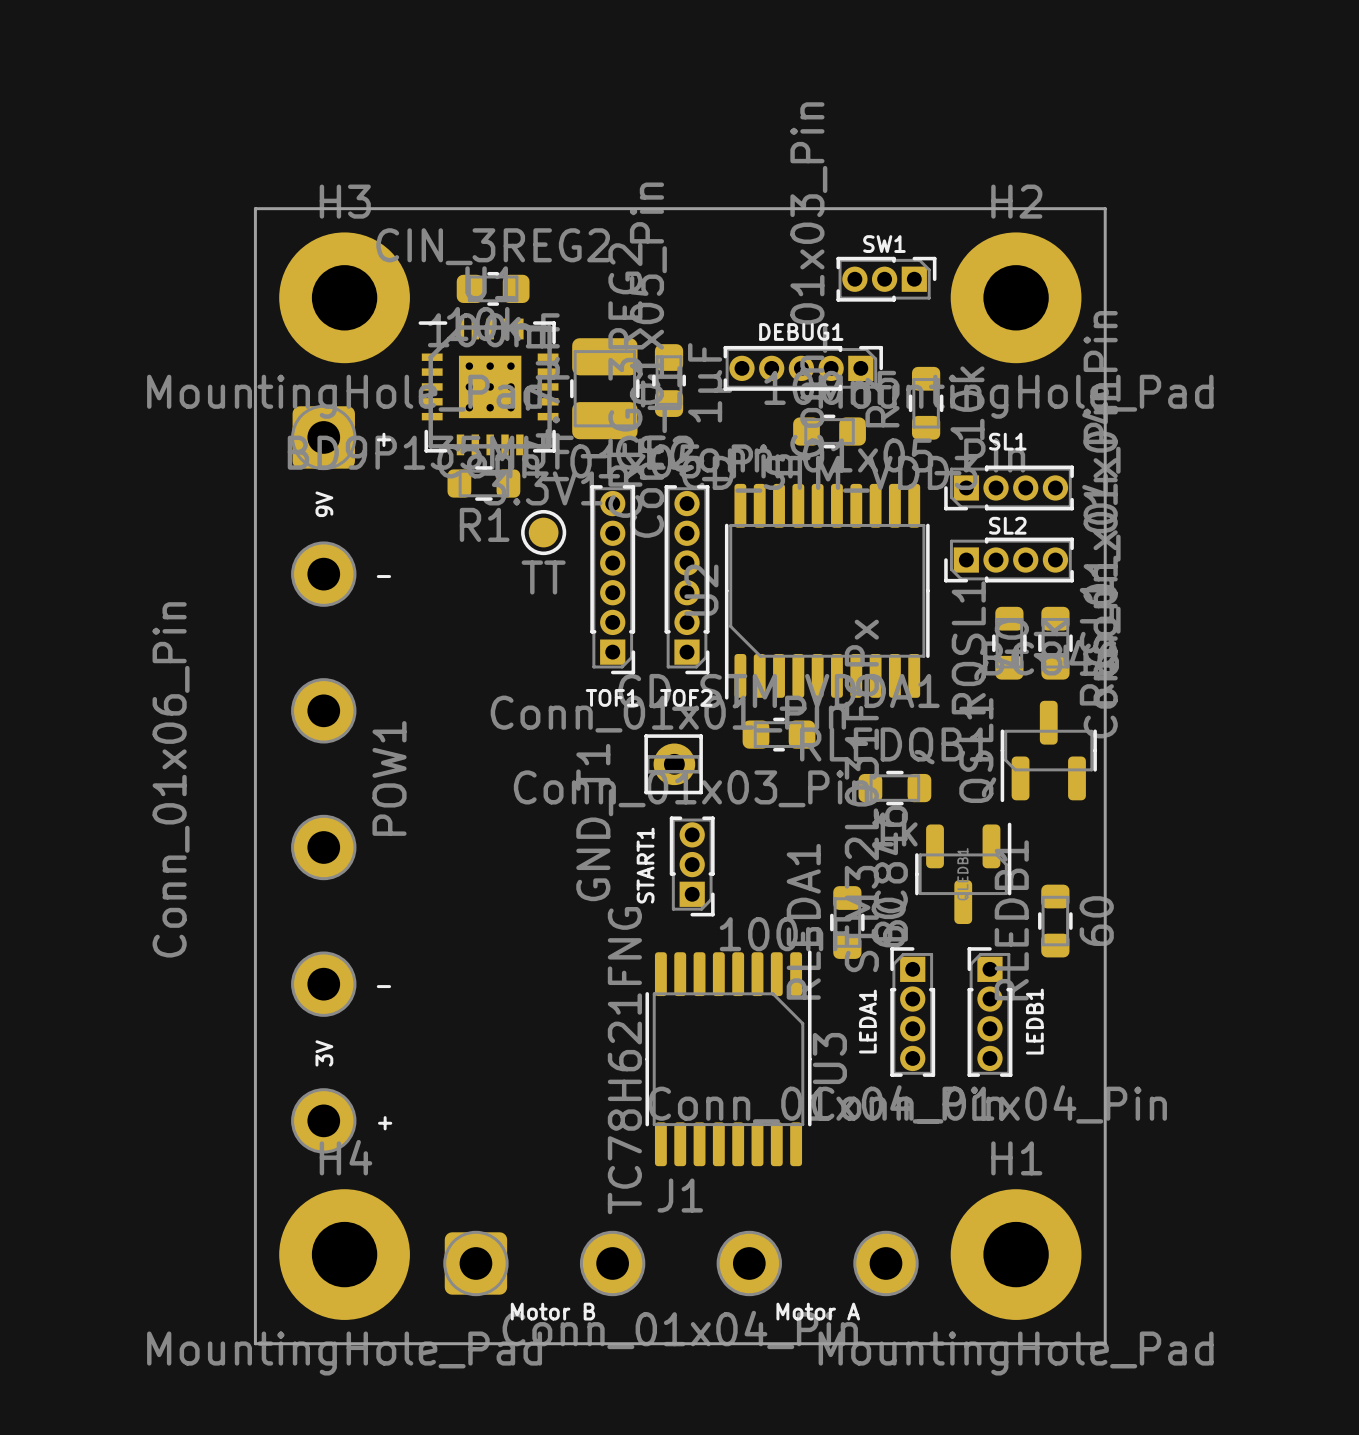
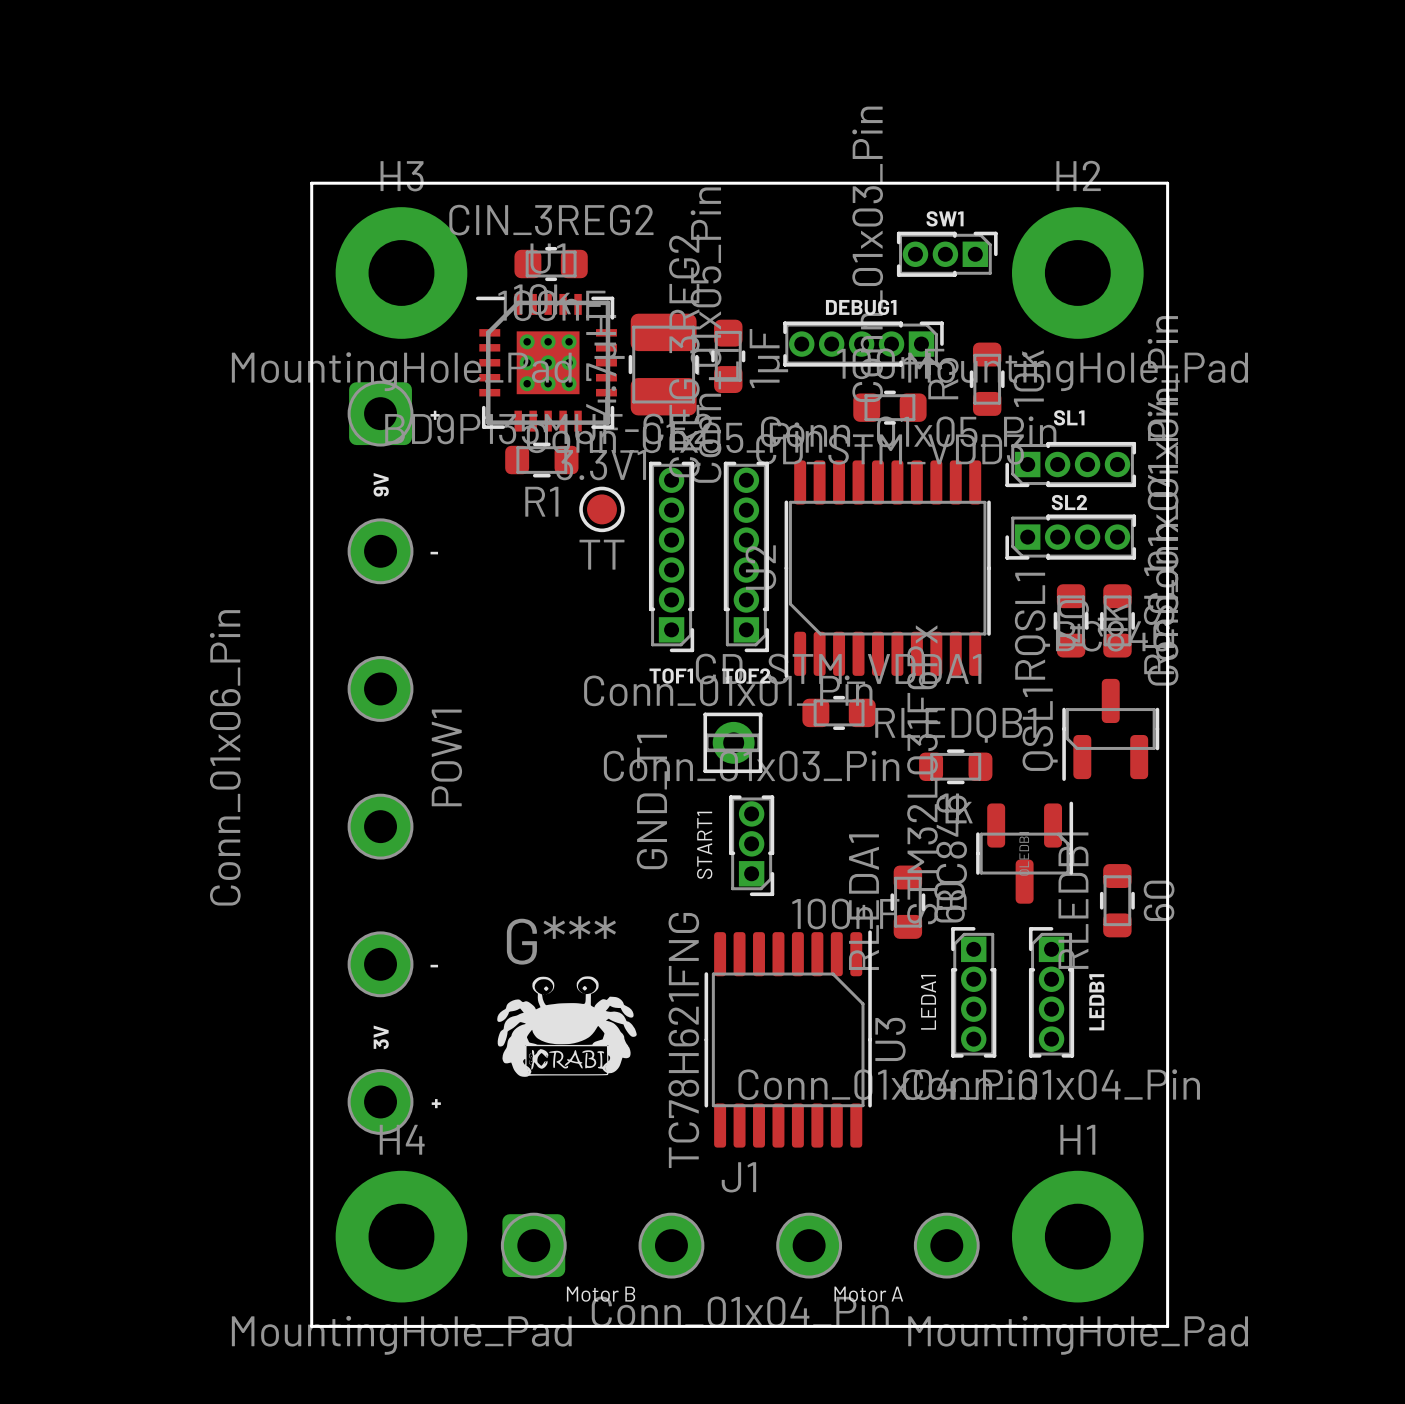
G***: none -> (566, 1026)

